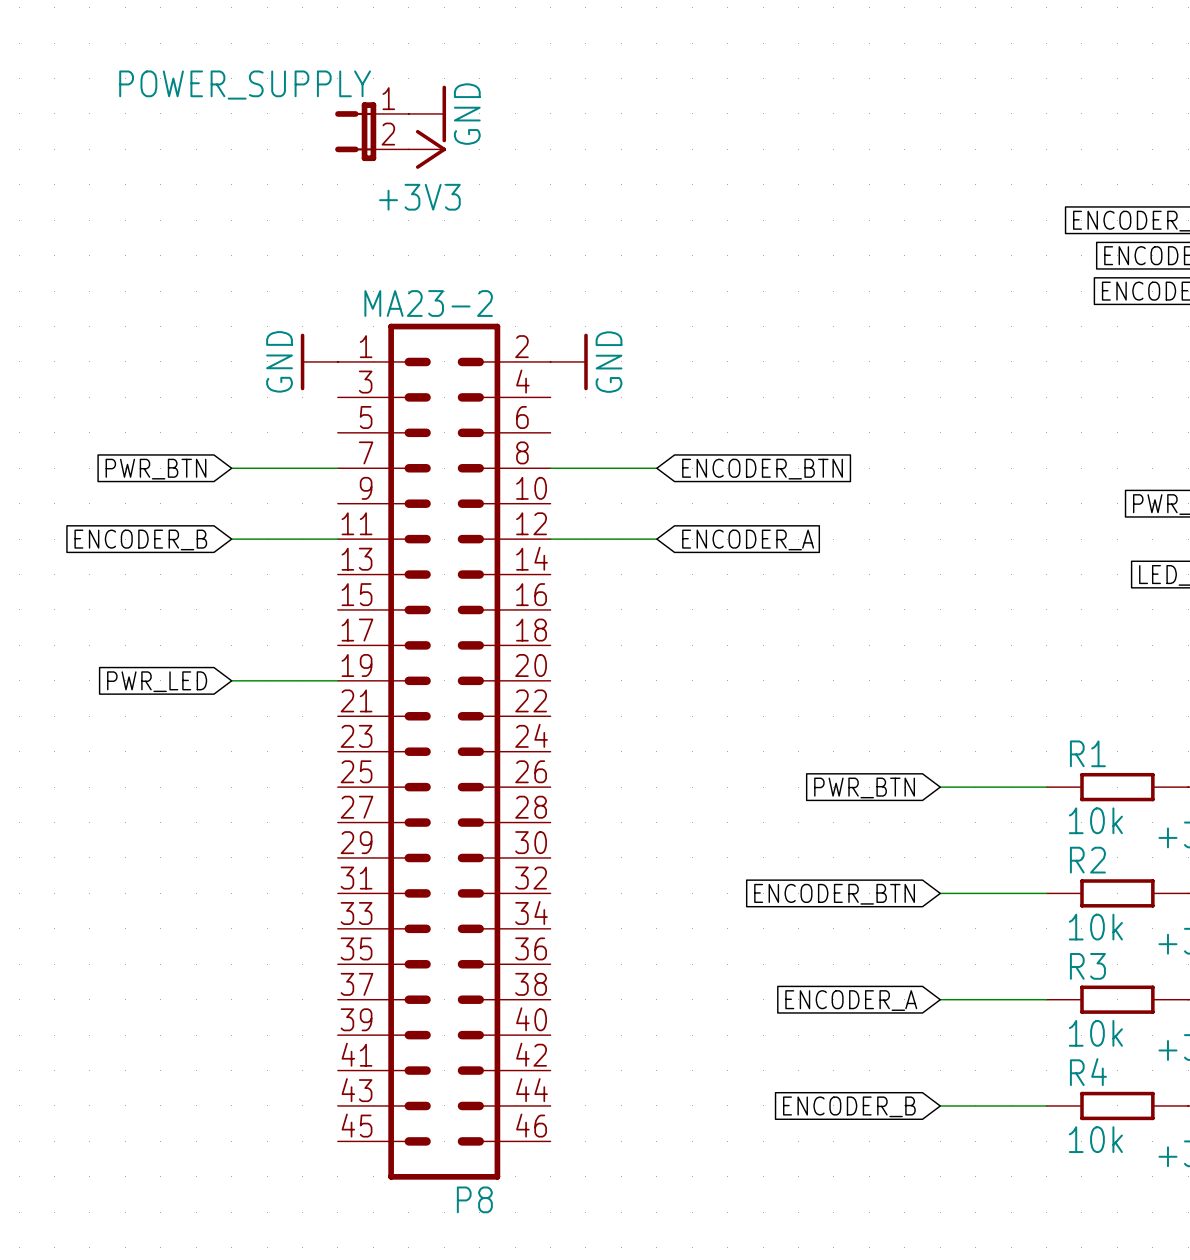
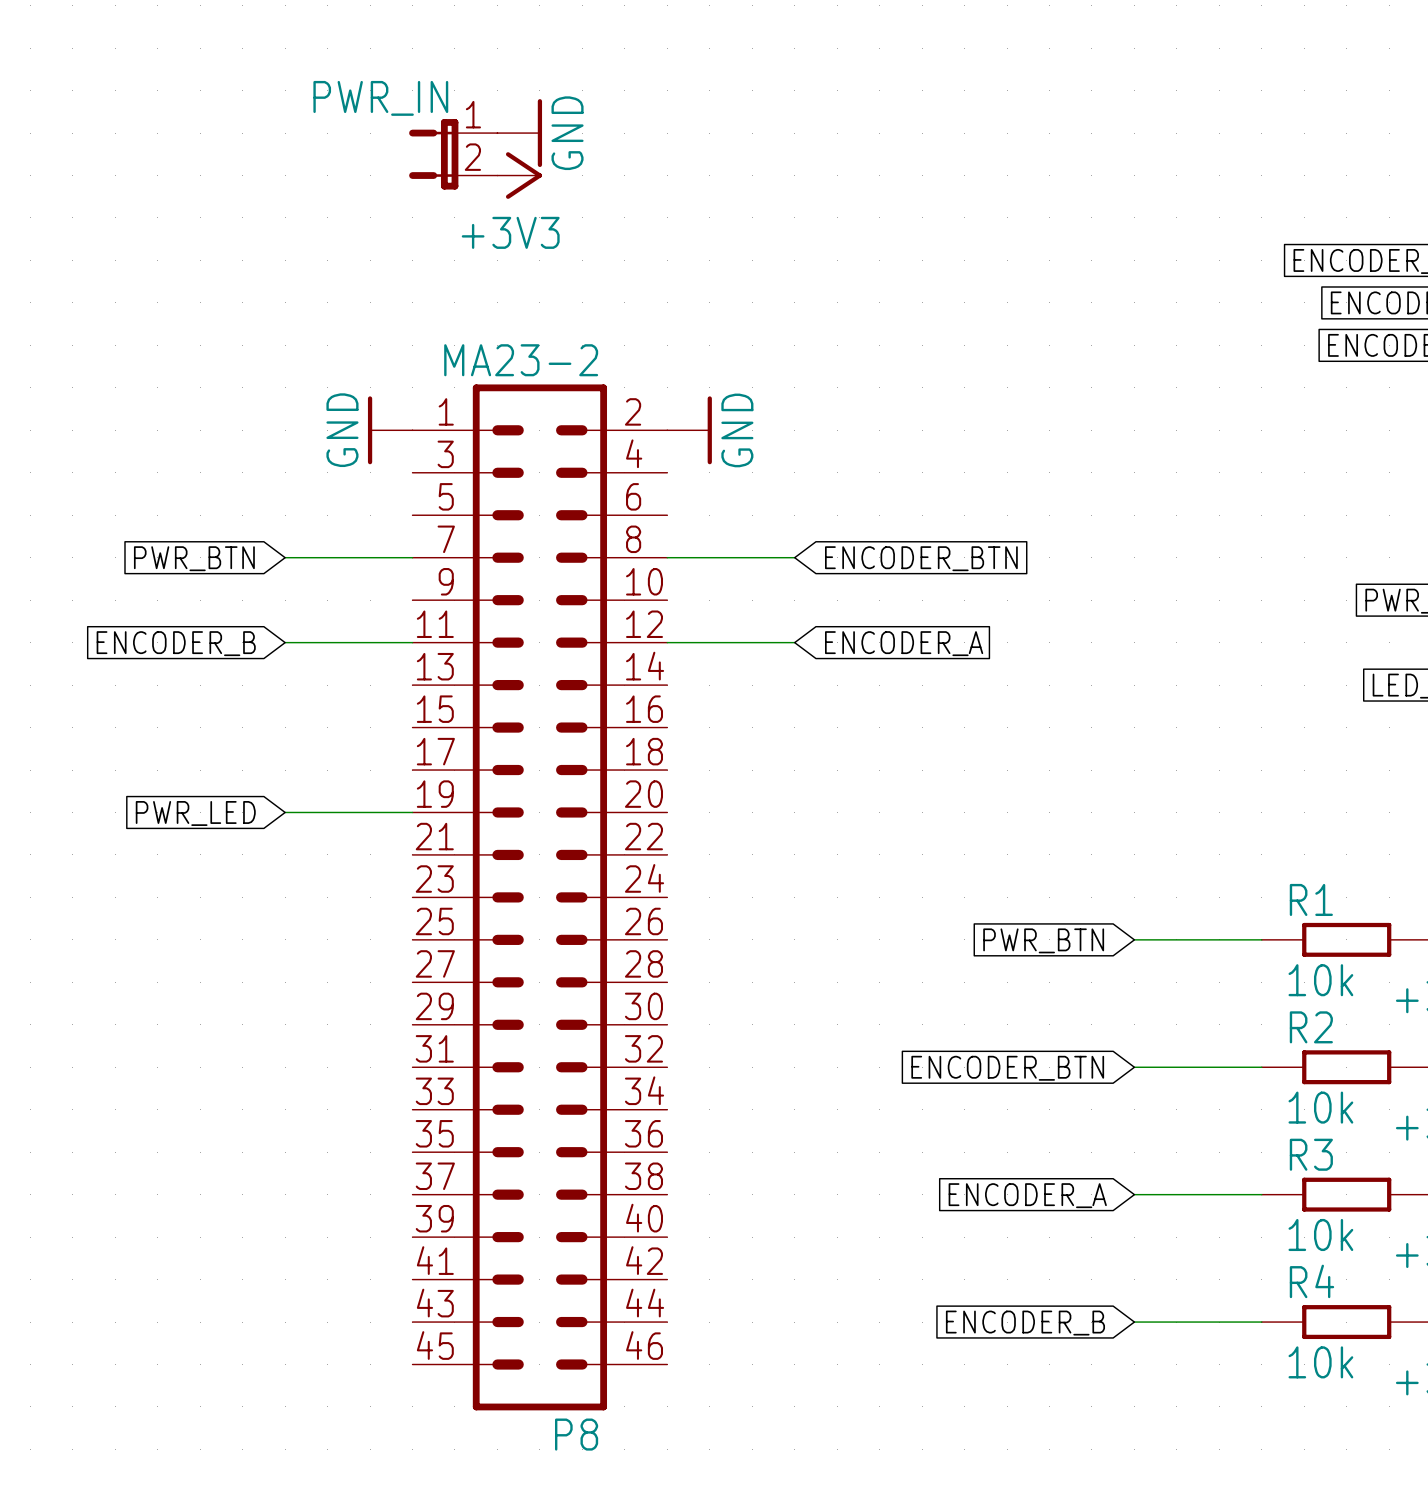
POWER_SUPPLY name: POWER_SUPPLY (245, 85) -> PWR_IN (380, 98)

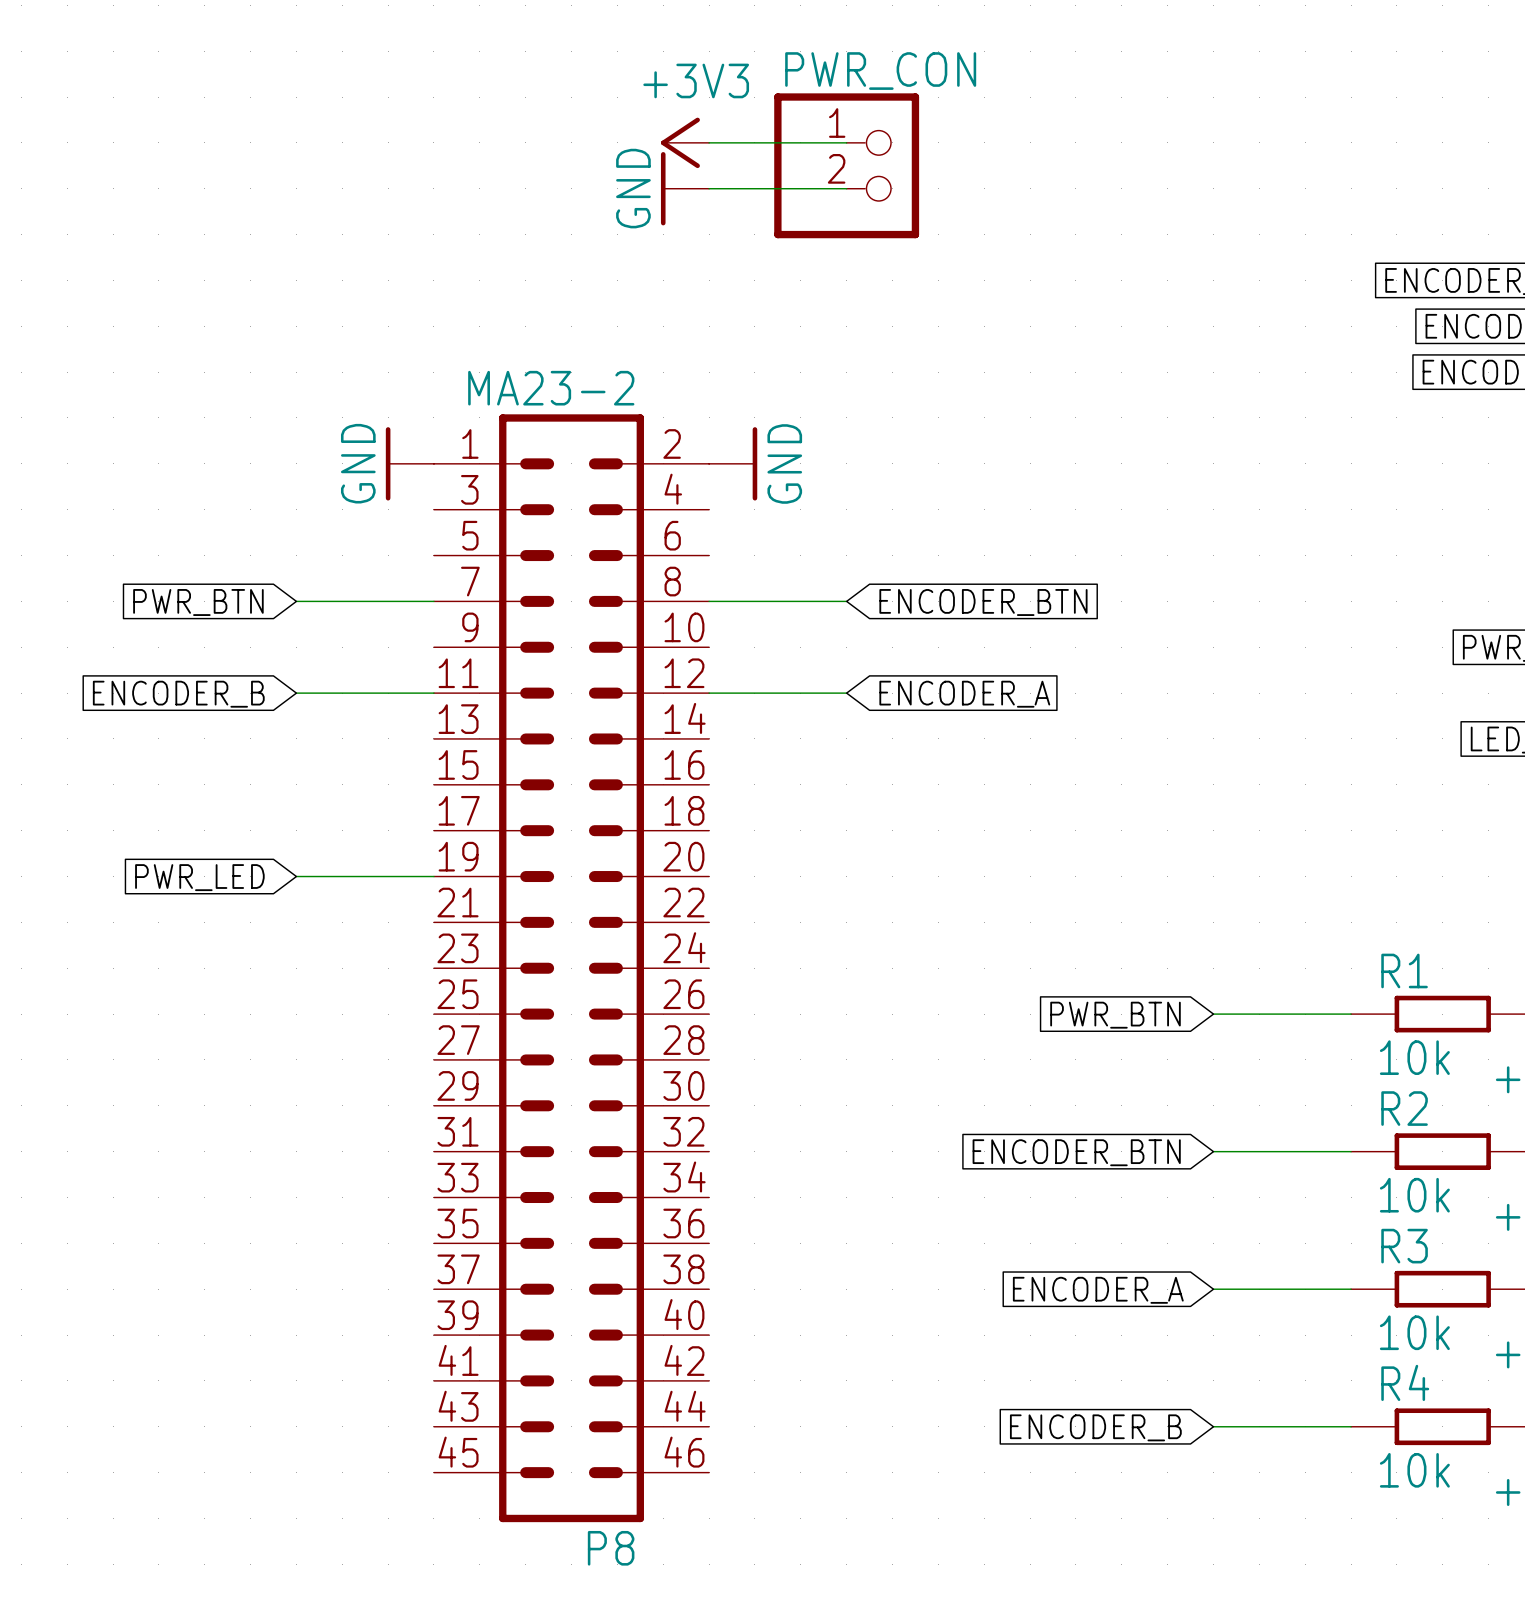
power symbol position: GND (519, 133) -> GND (685, 188)
power symbol rotation: 0° (539, 133) -> 180° (663, 188)
wire: none -> (709, 142) (846, 142)
PWR_IN: (453, 154) -> none
PWR_CON: none -> (846, 165)
power symbol position: +3V3 (519, 175) -> +3V3 (685, 142)
power symbol rotation: 0° (523, 175) -> 180° (680, 142)
wire: none -> (709, 188) (846, 188)

